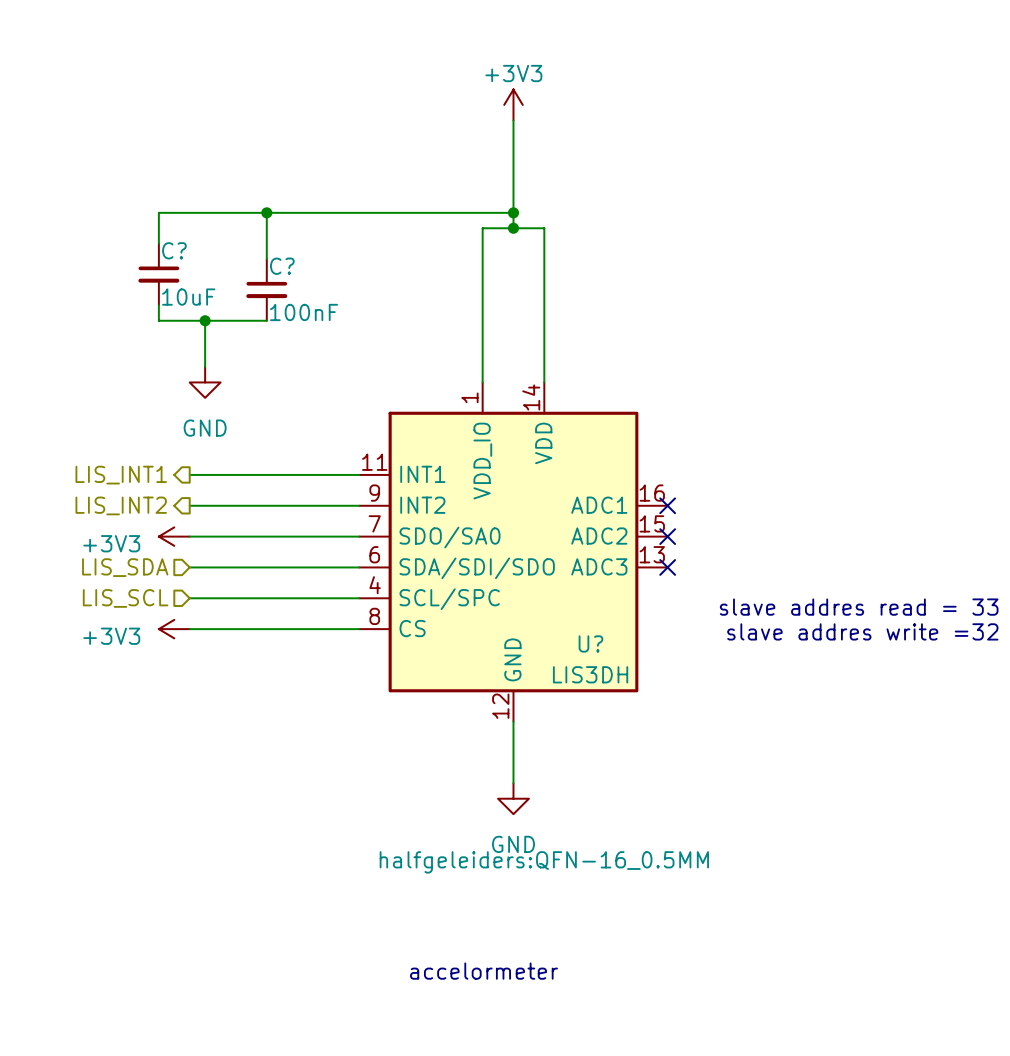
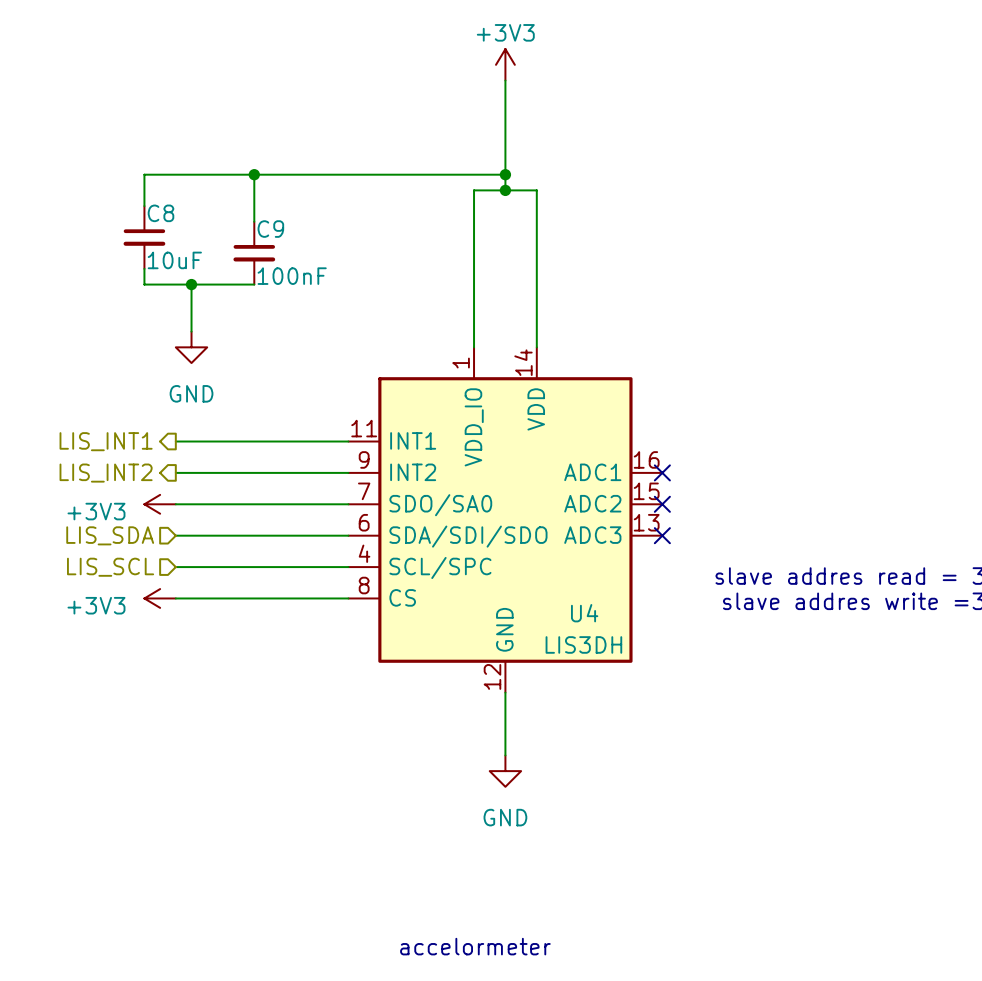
C? name: C? (174, 250) -> C8 (160, 213)
C? name: C? (282, 266) -> C9 (270, 229)
U? name: U? (590, 643) -> U4 (584, 613)
U? text: halfgeleiders:QFN-16_0.5MM (544, 862) -> none

